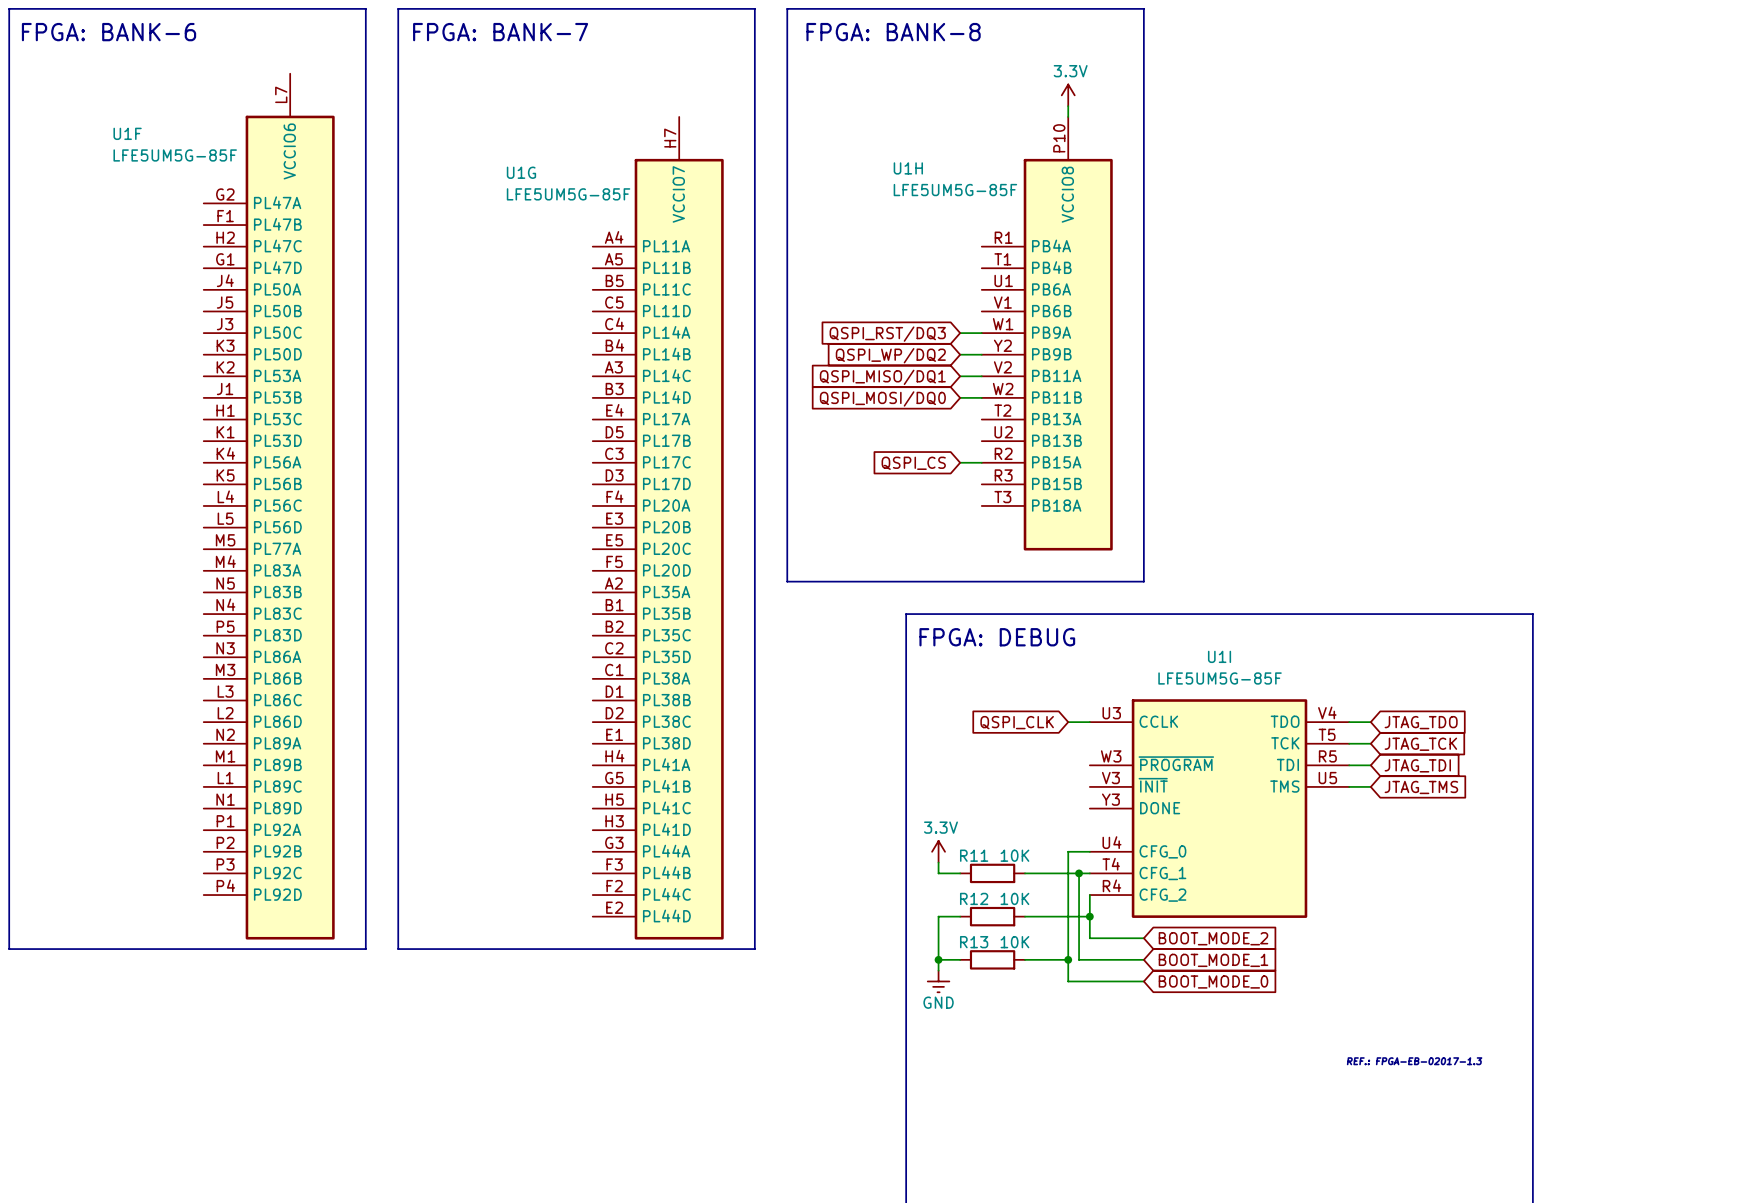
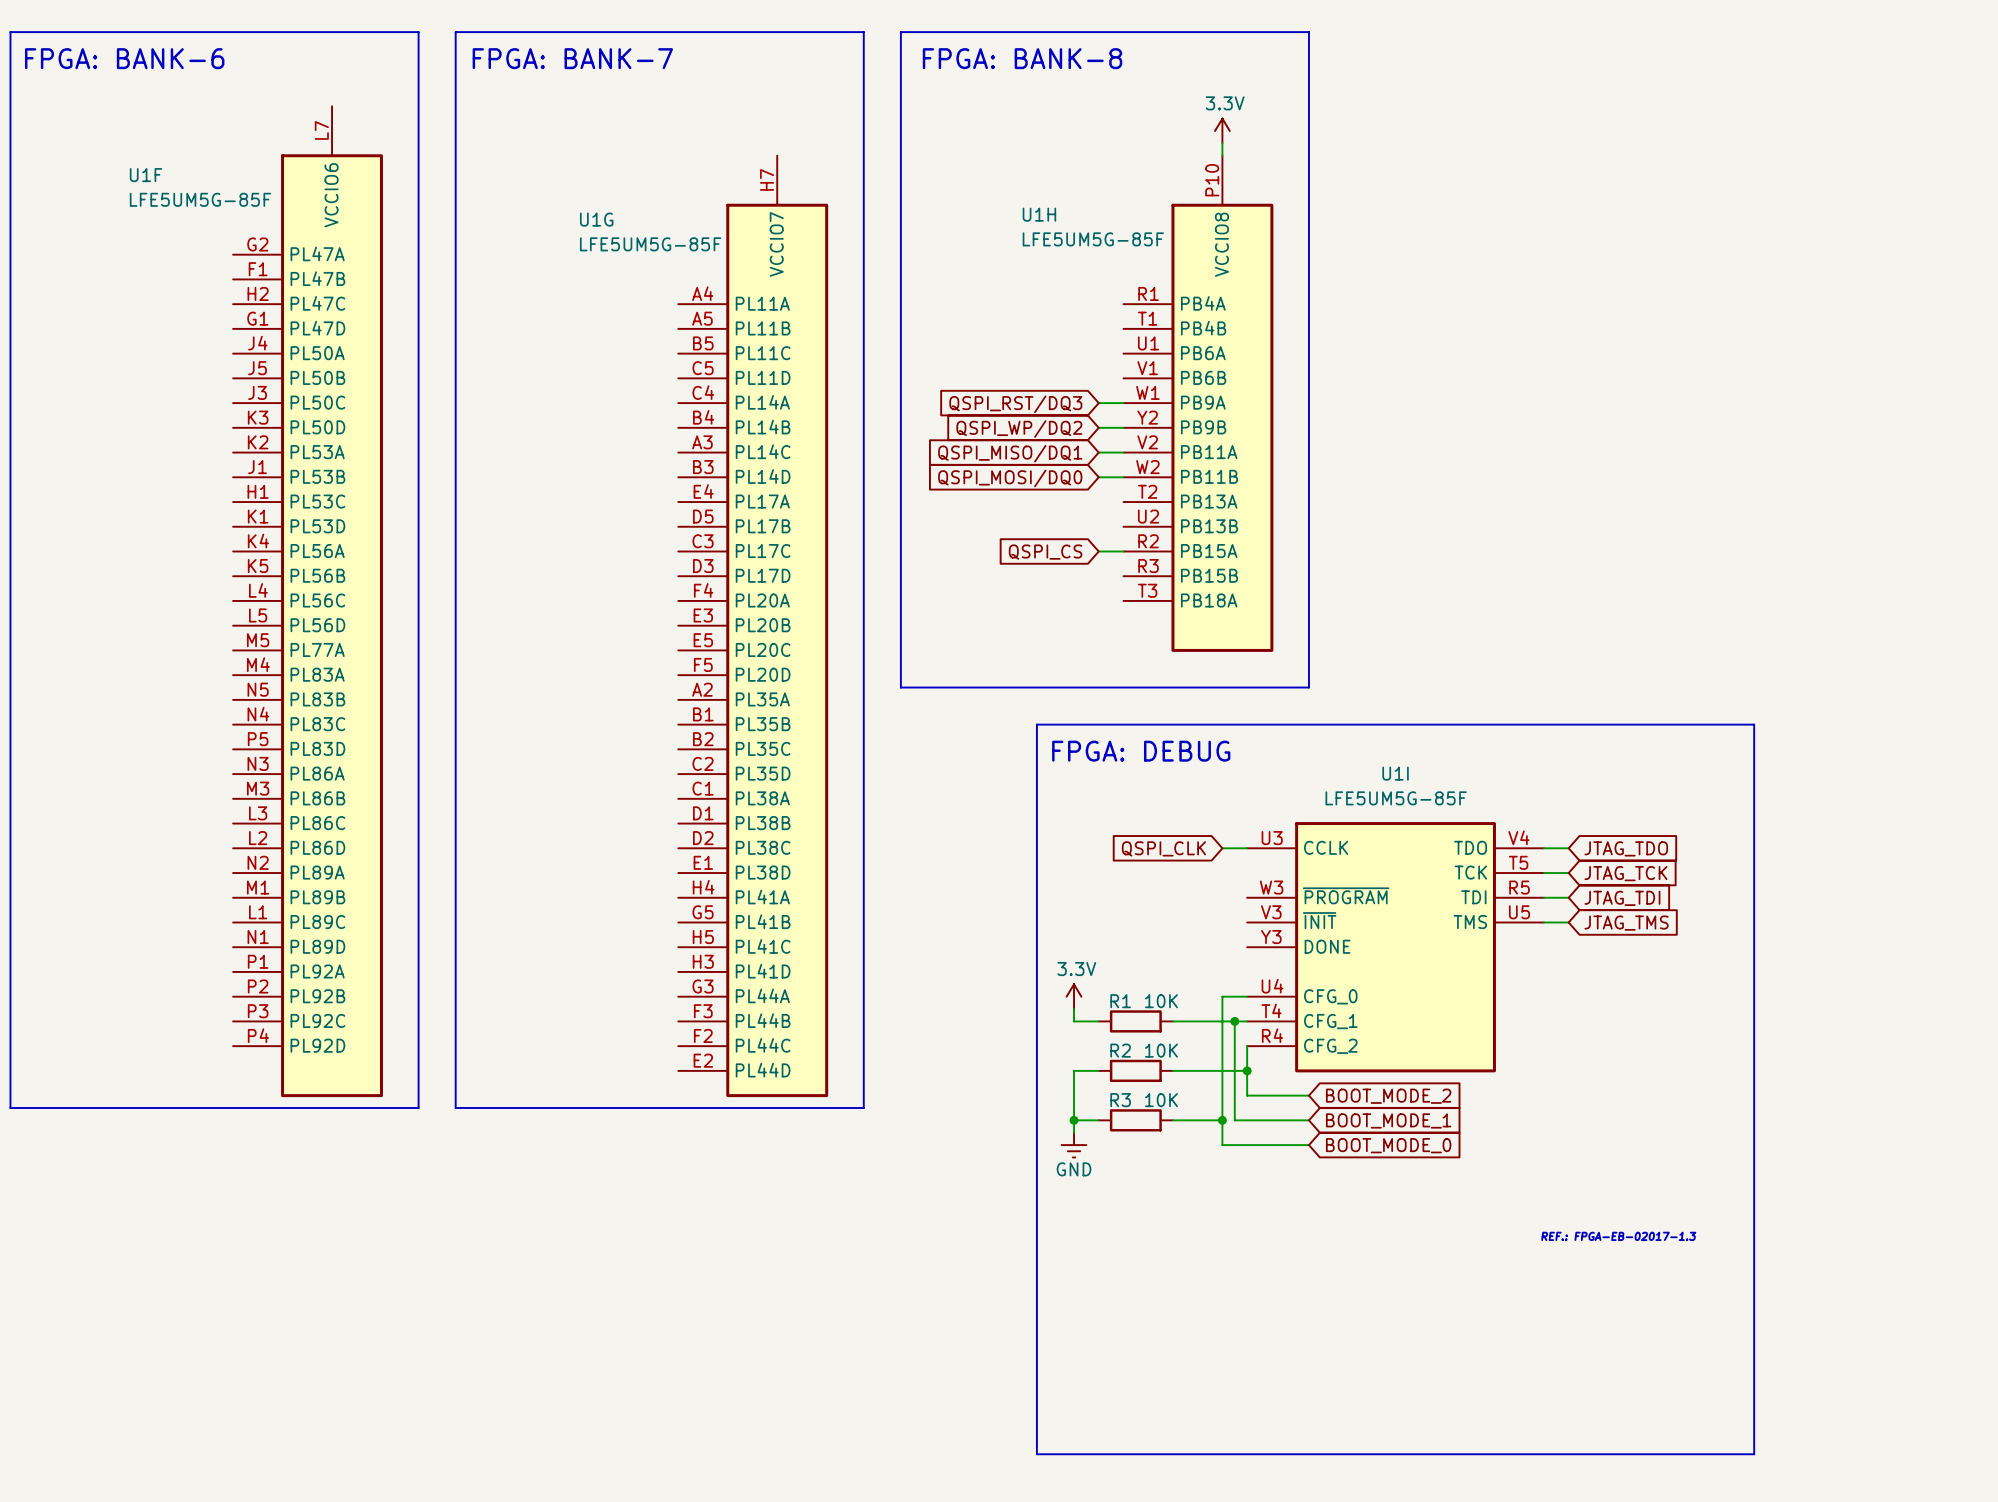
R11 name: R11 (974, 855) -> R1 (1120, 1001)
R12 name: R12 (974, 898) -> R2 (1120, 1050)
R13 name: R13 (974, 942) -> R3 (1120, 1100)

